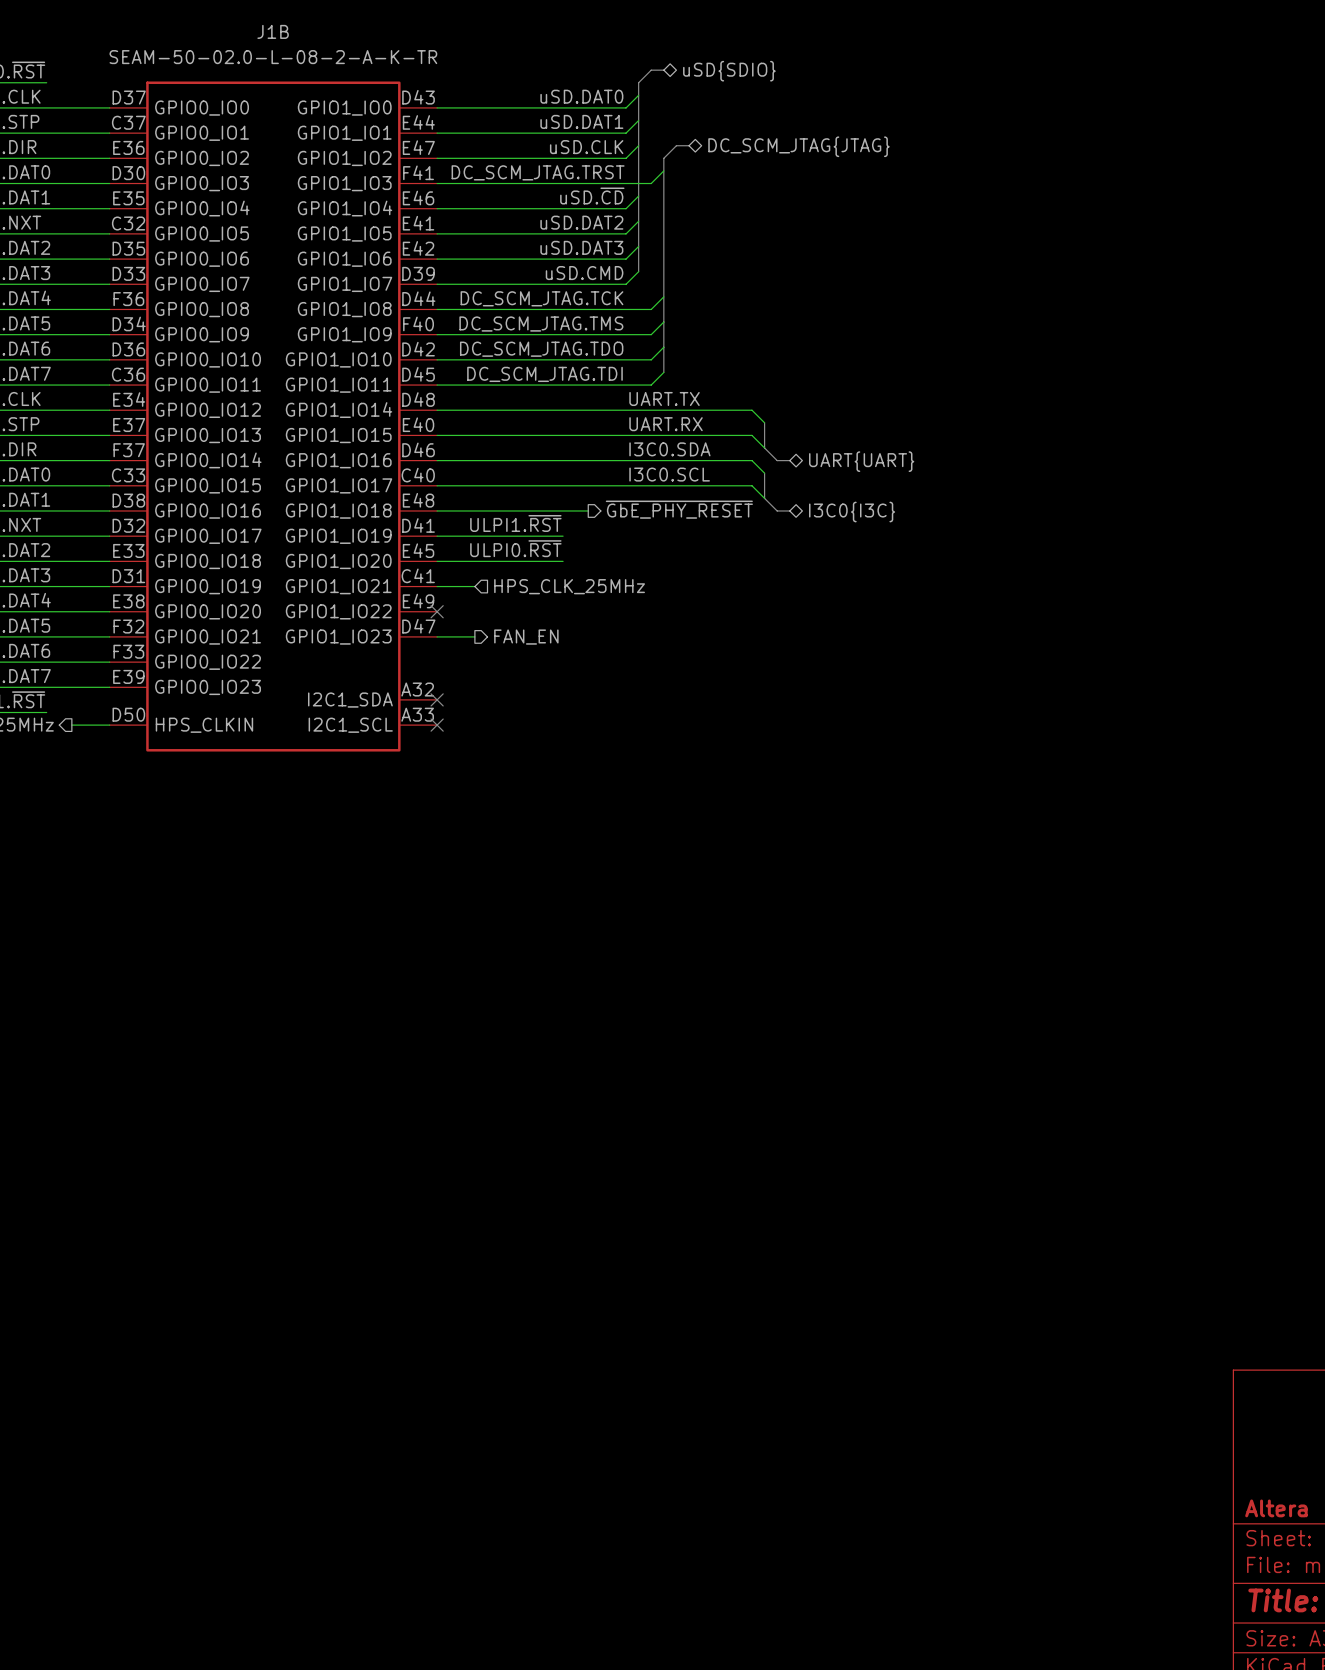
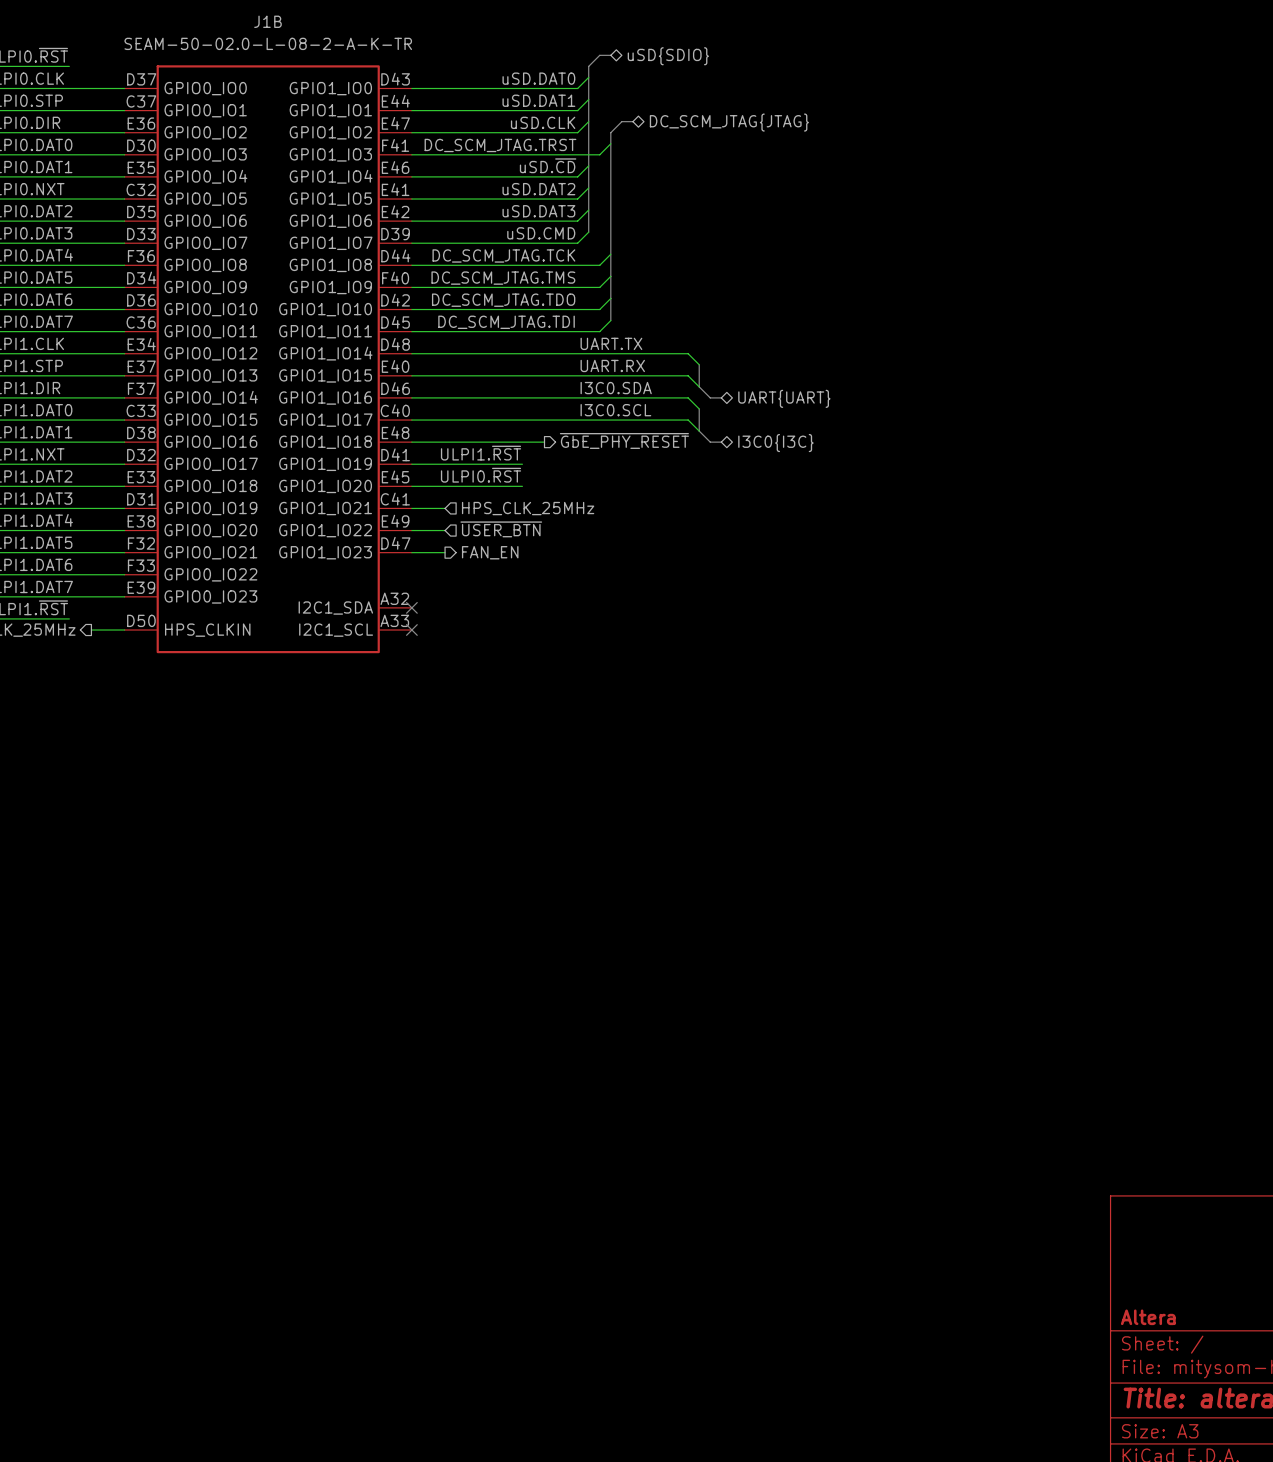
hierarchical label: none -> ~{USER_BTN} (501, 529)
wire: none -> (411, 530) (445, 530)
no-connect mark: (437, 611) -> none

